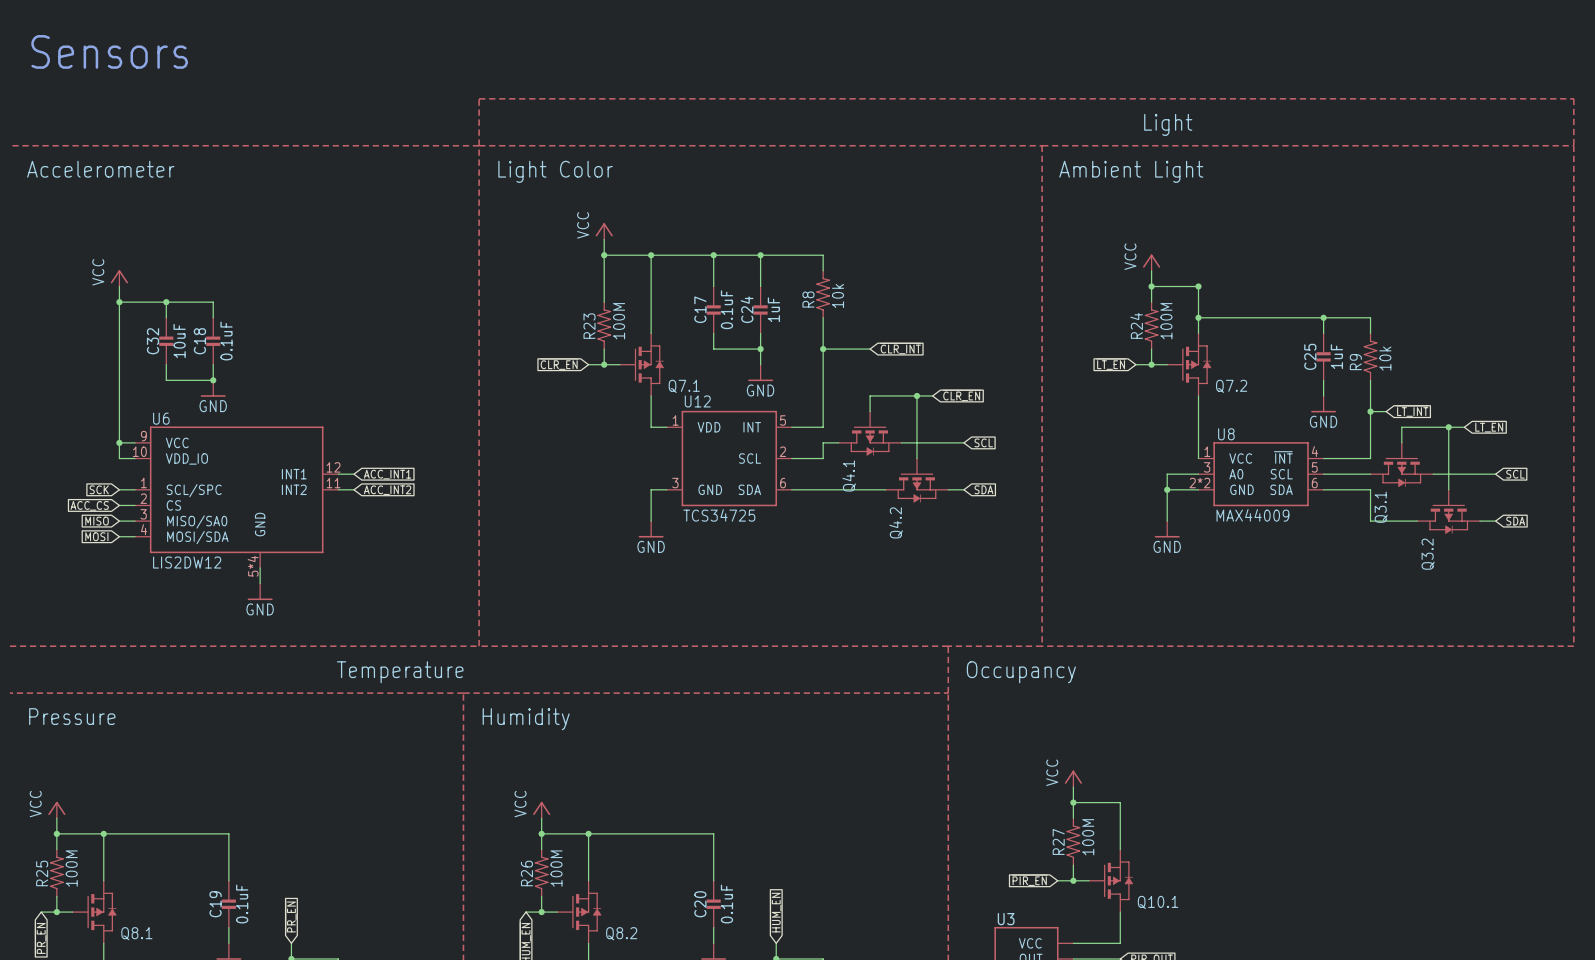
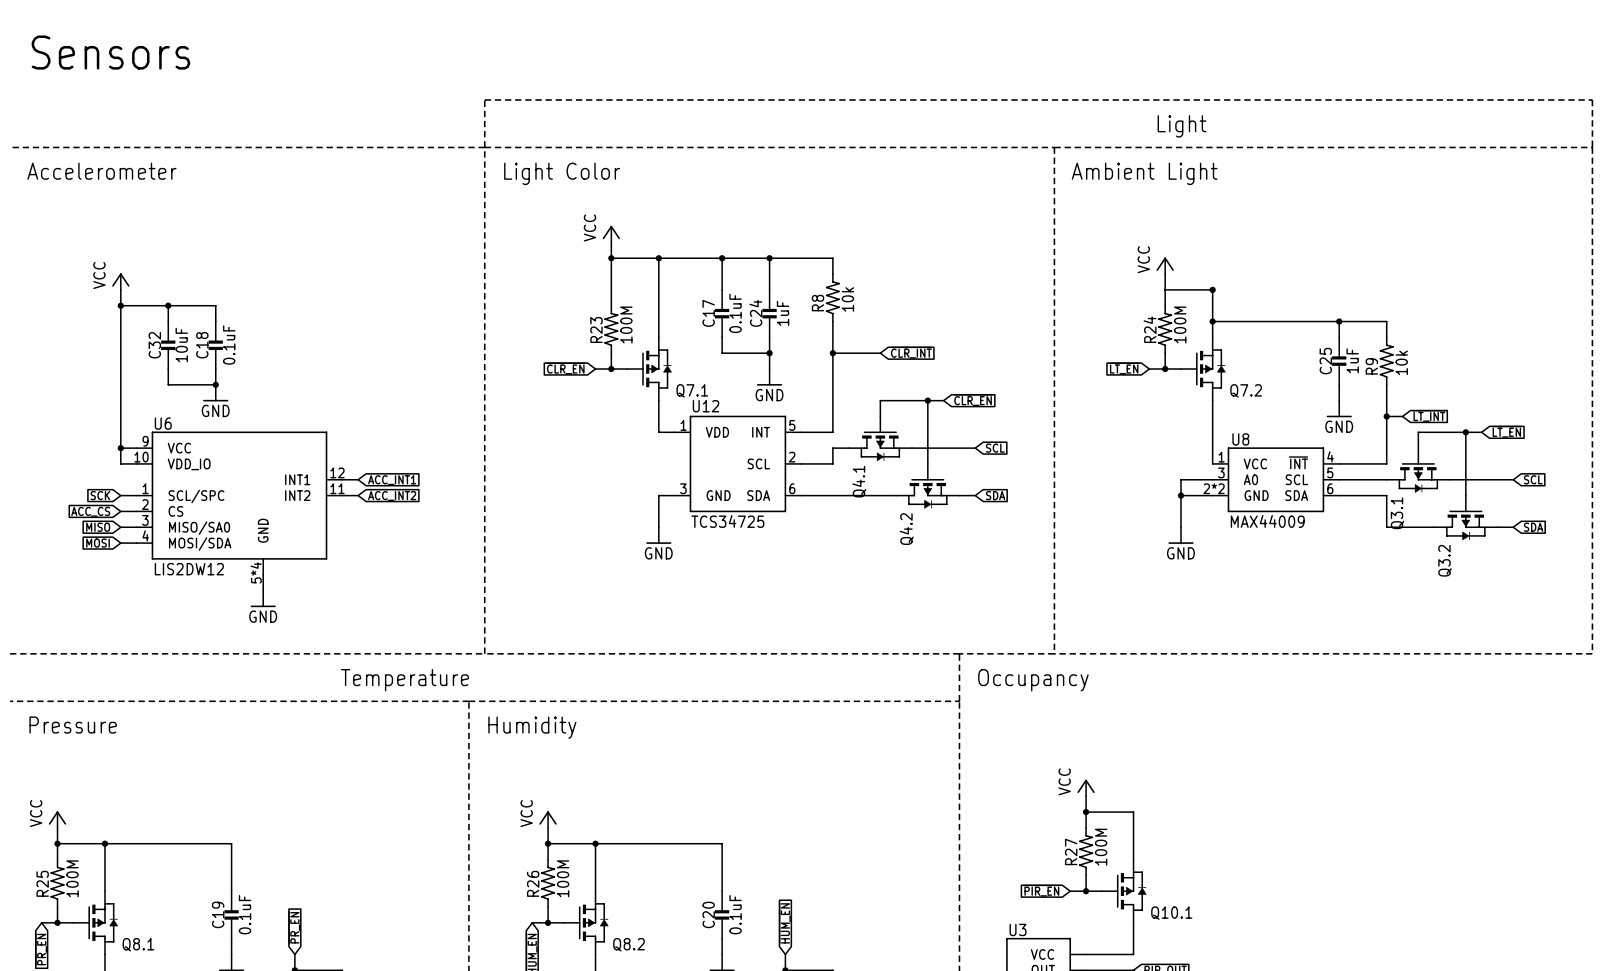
junction: (1151, 286) -> none

